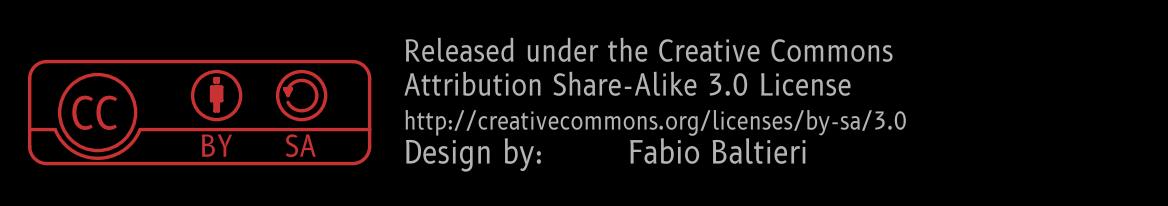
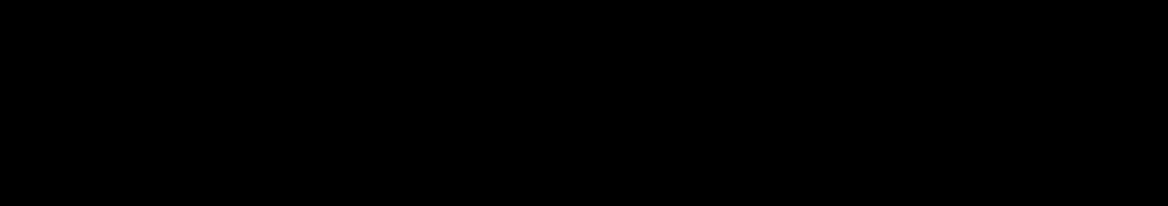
part: Fabio Baltieri (655, 104) -> none
part: (199, 112) -> none

